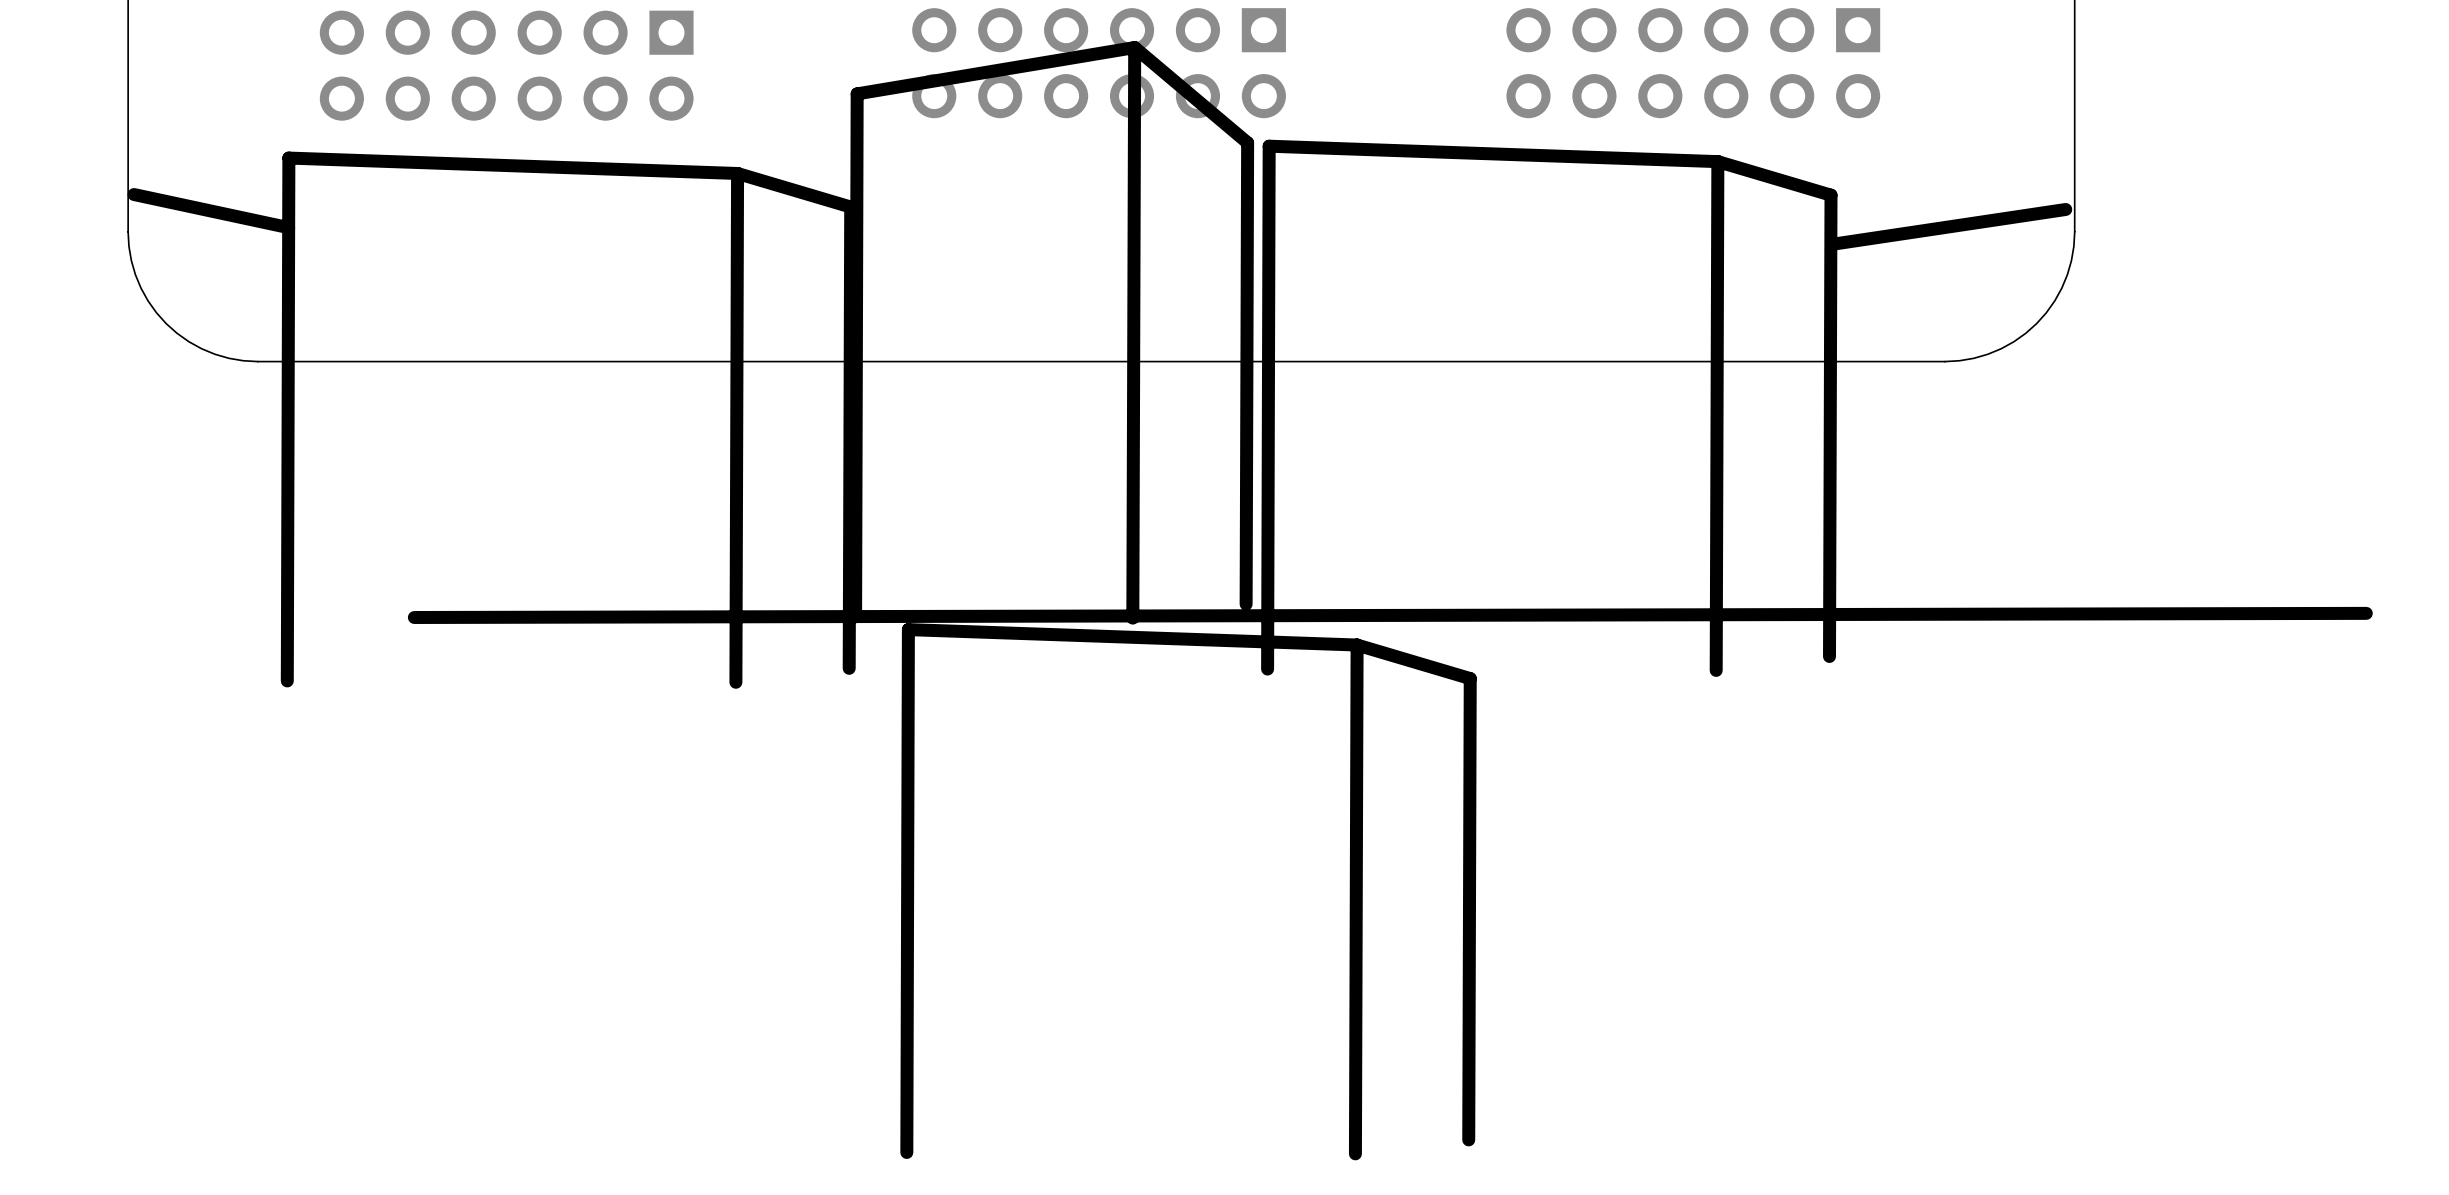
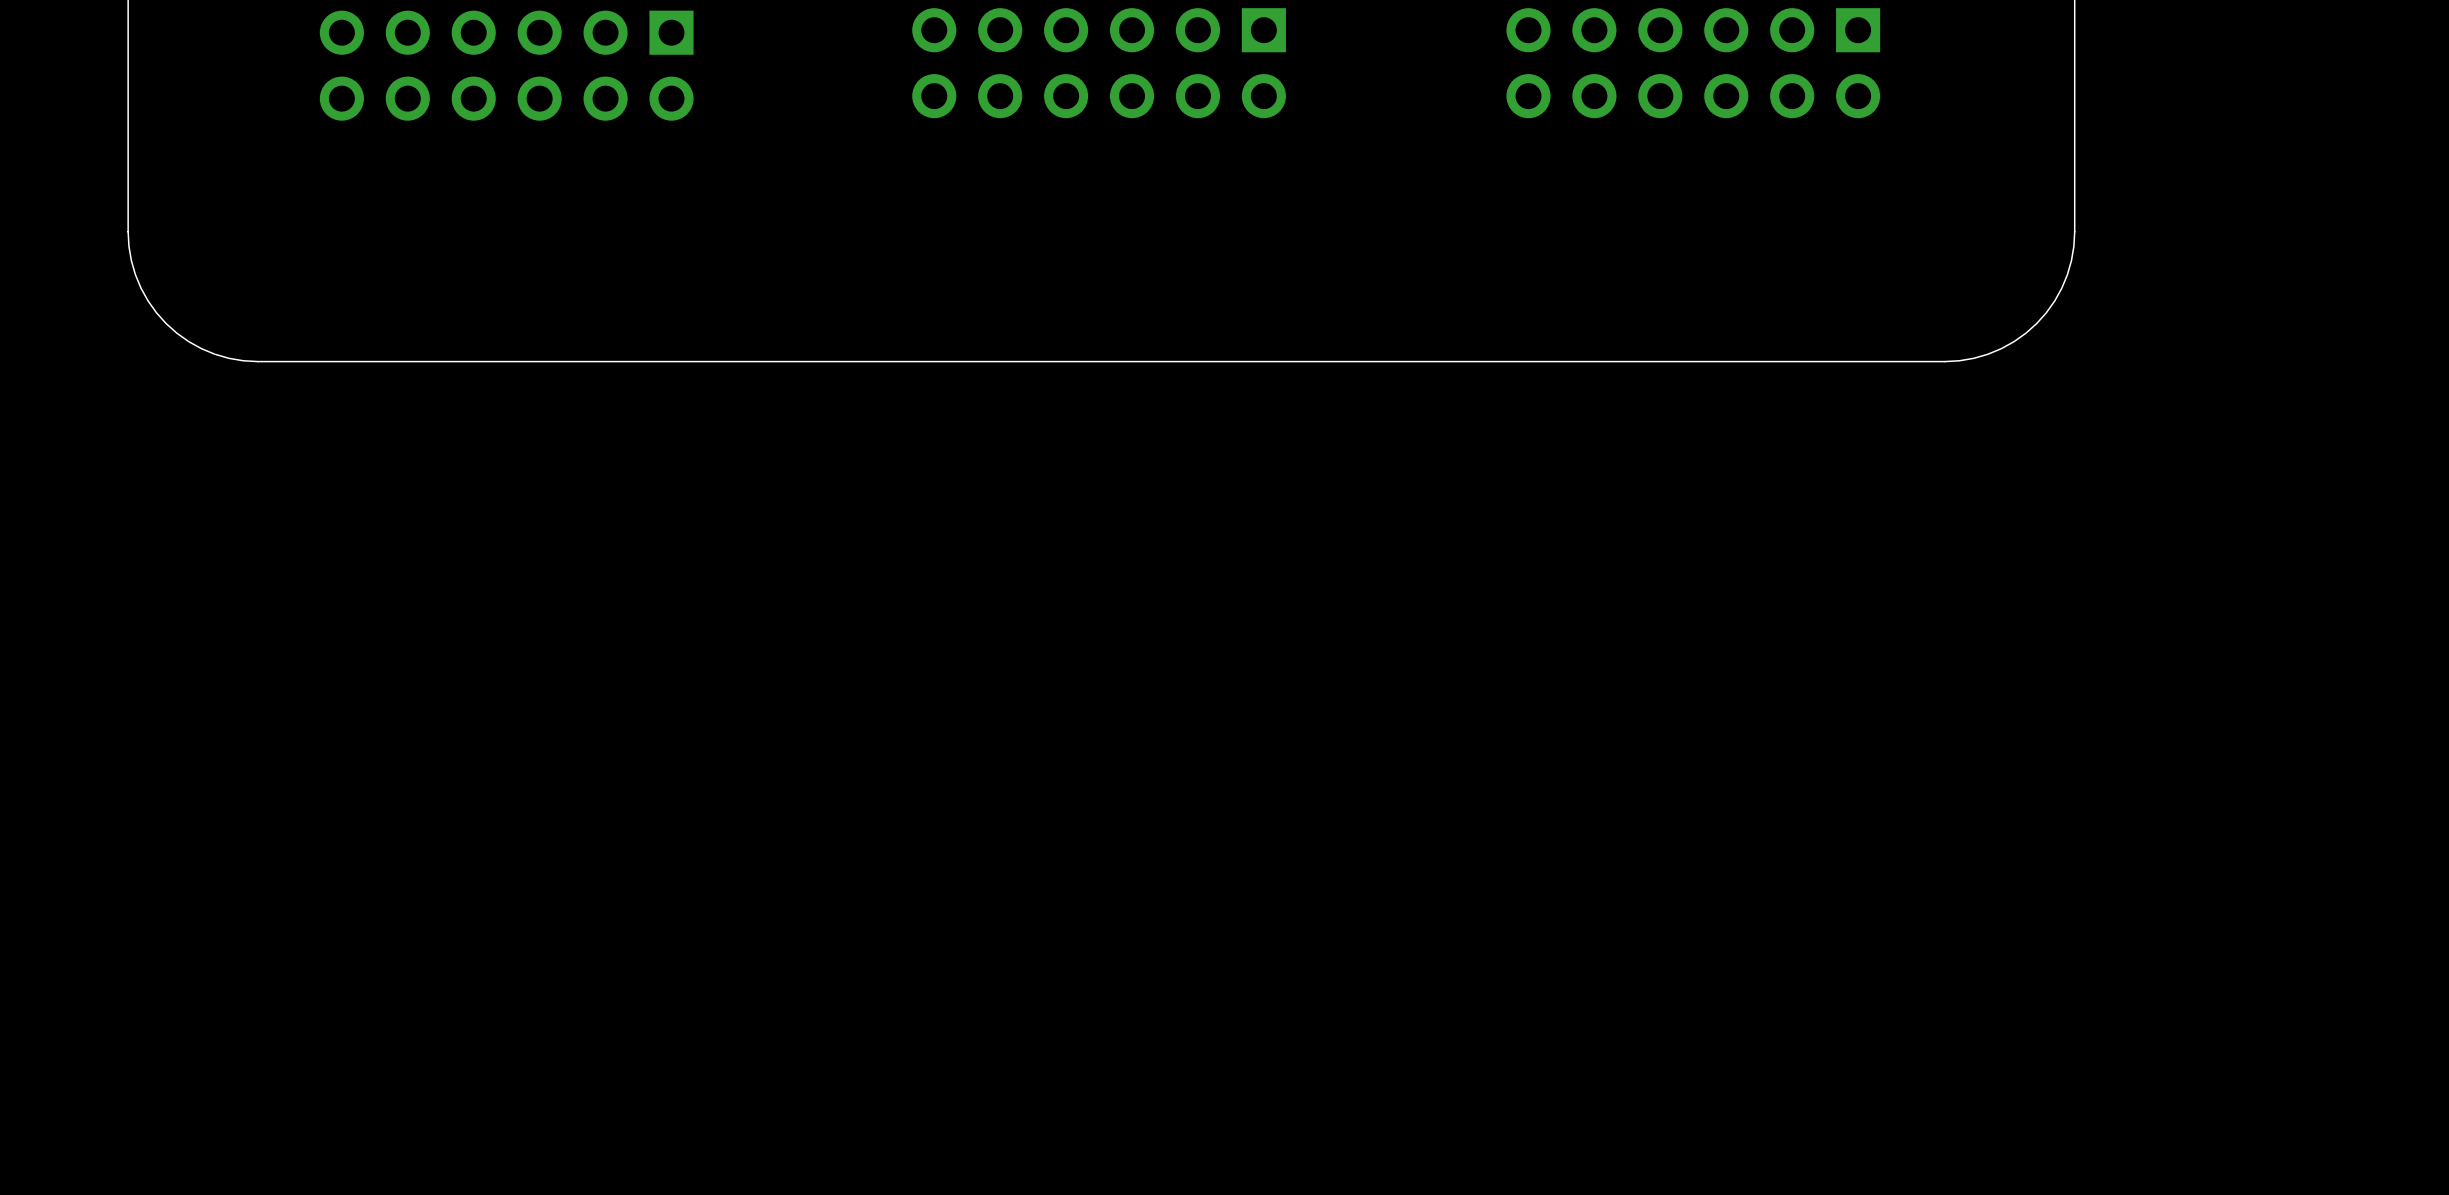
line: (1134, 47) (857, 93) (855, 616) -> none
line: (1717, 161) (1269, 146) (1267, 669) -> none
line: (1717, 161) (1831, 195) (1829, 656) -> none
line: (1717, 161) (1716, 670) -> none
line: (737, 173) (288, 158) (287, 680) -> none
line: (737, 173) (850, 207) (849, 668) -> none
line: (737, 173) (735, 682) -> none
line: (134, 194) (288, 227) -> none
line: (2065, 209) (1831, 244) -> none
line: (1246, 604) (1247, 142) (1134, 47) (1132, 618) -> none
line: (2366, 613) (414, 617) -> none
line: (1357, 645) (1470, 678) (1468, 1139) -> none
line: (1357, 645) (1355, 1153) -> none
line: (1357, 645) (908, 629) (906, 1152) -> none

